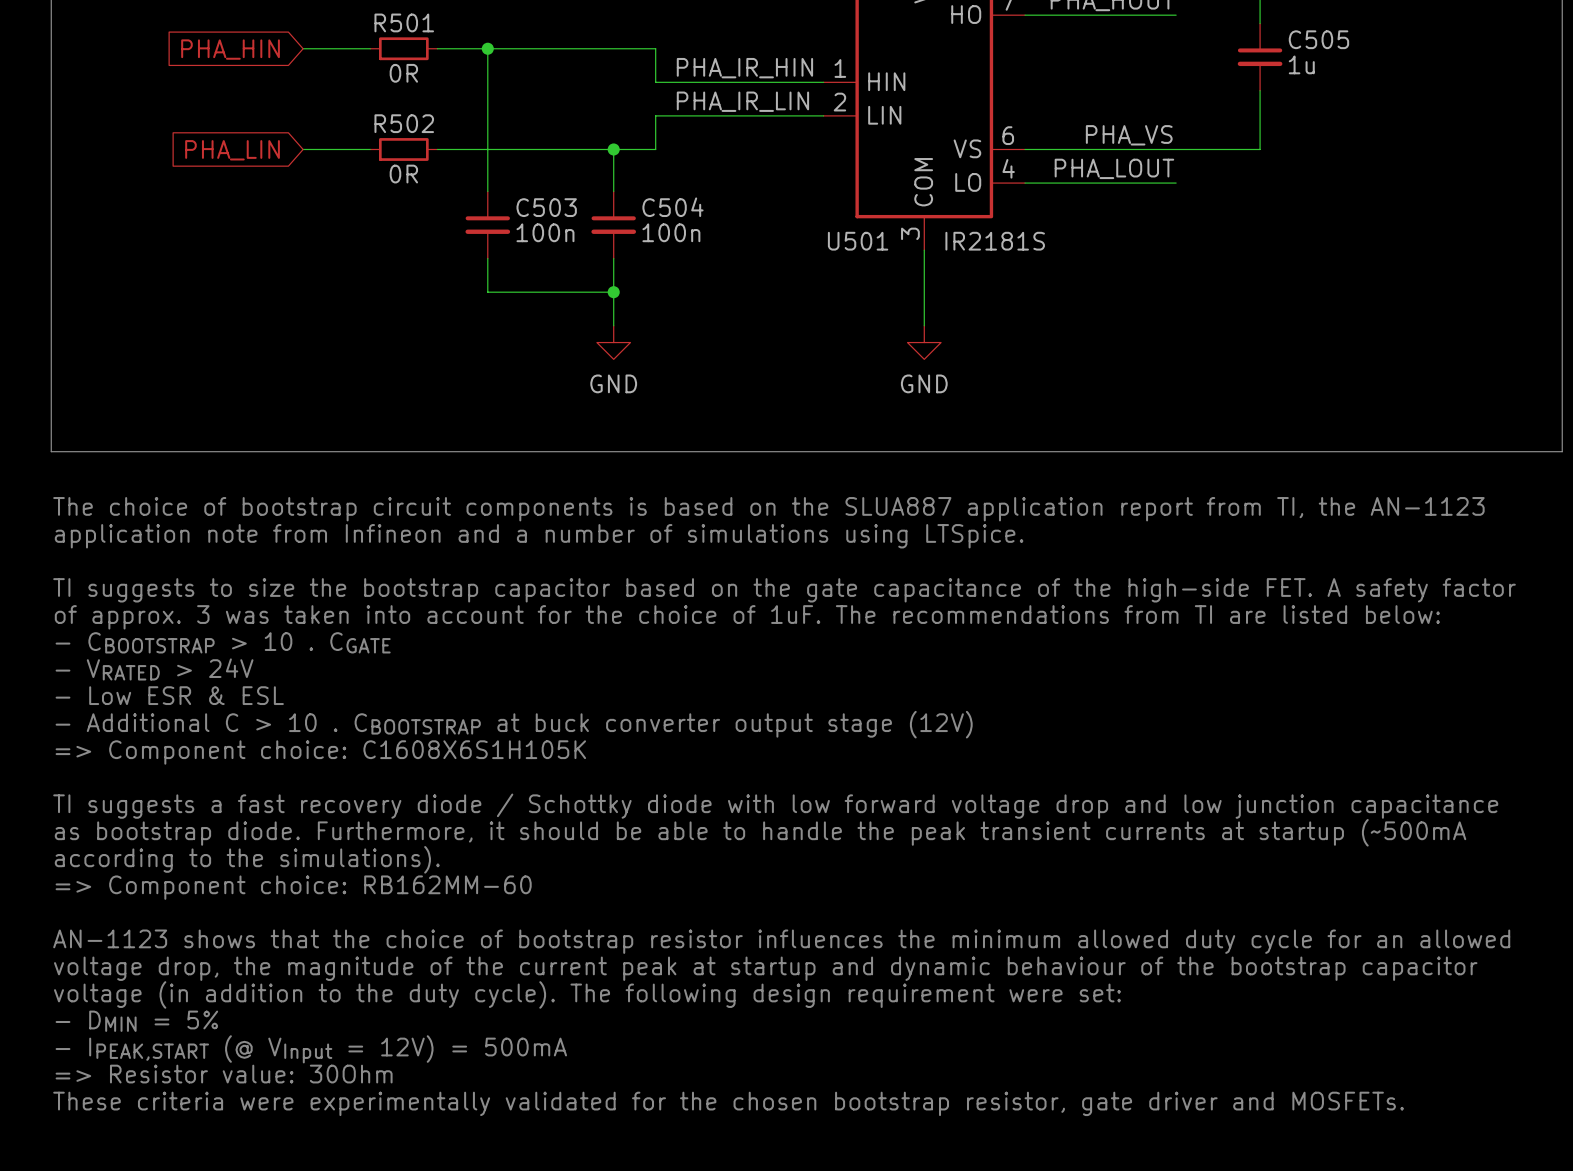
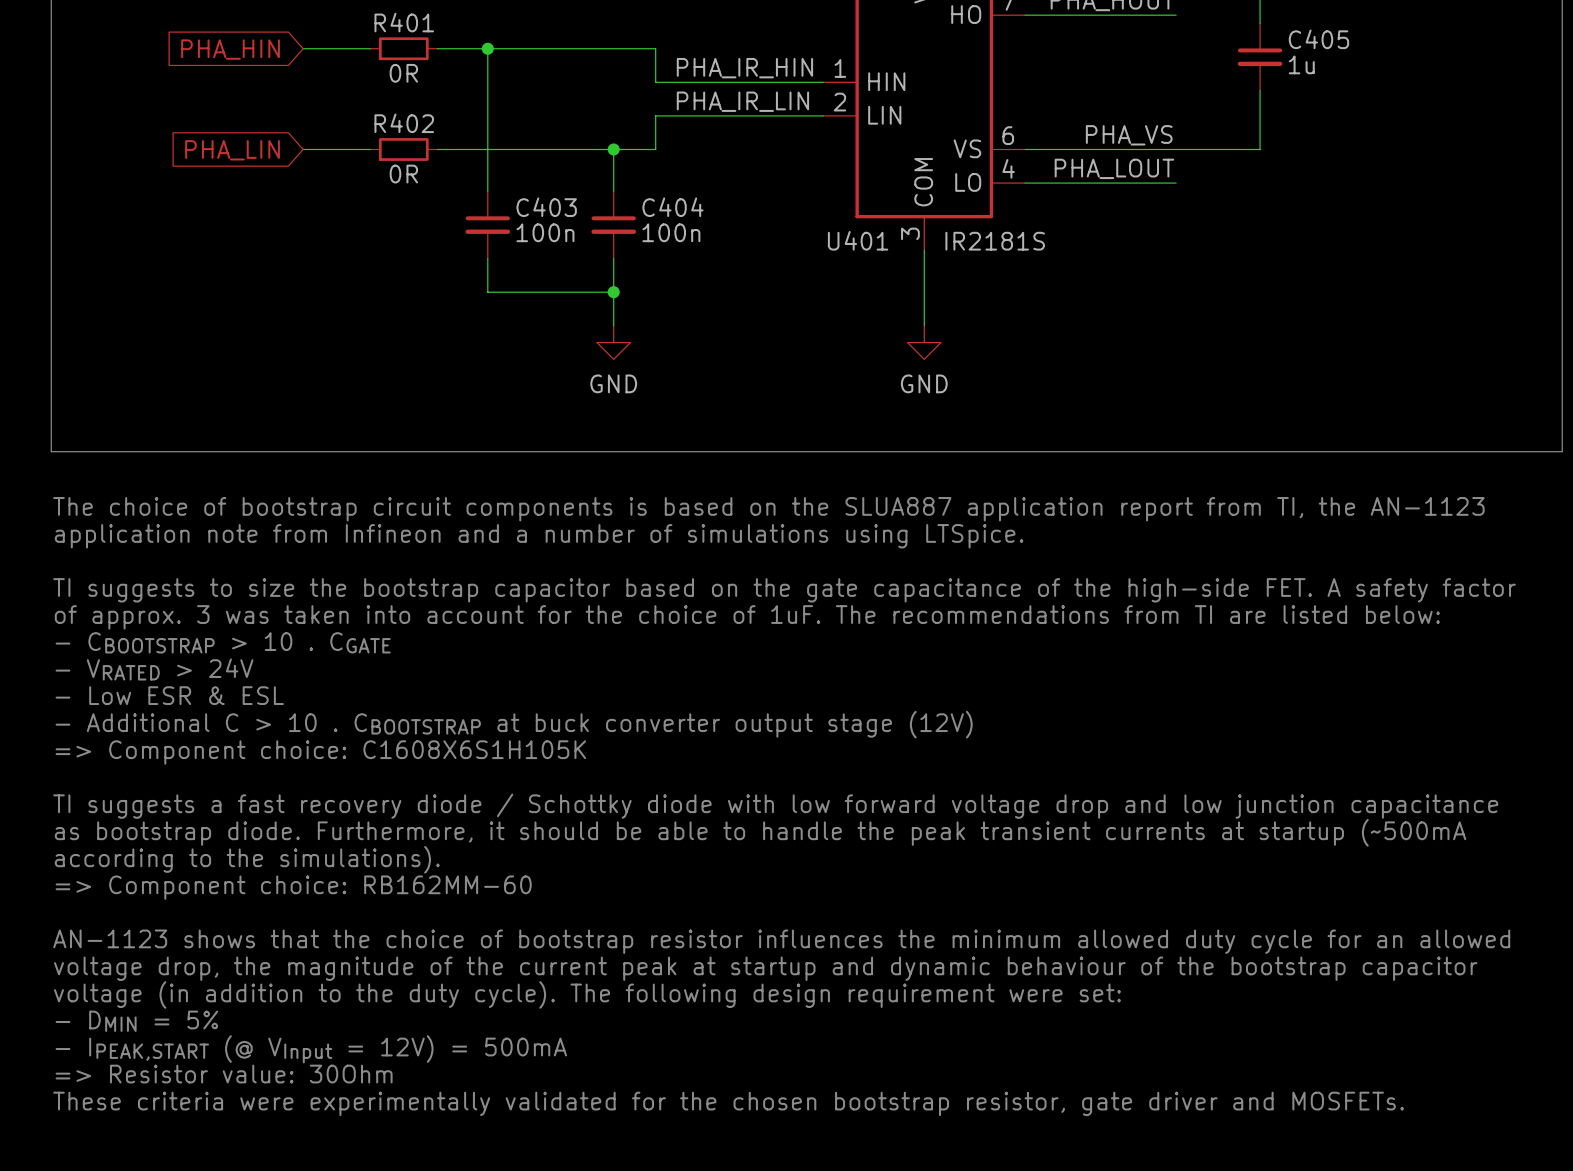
R501 name: R501 (404, 22) -> R401 (404, 22)
C505 name: C505 (1318, 39) -> C405 (1318, 39)
R502 name: R502 (404, 123) -> R402 (404, 123)
C503 name: C503 (546, 207) -> C403 (546, 207)
C504 name: C504 (672, 207) -> C404 (672, 207)
U501 name: U501 (858, 241) -> U401 (858, 240)

